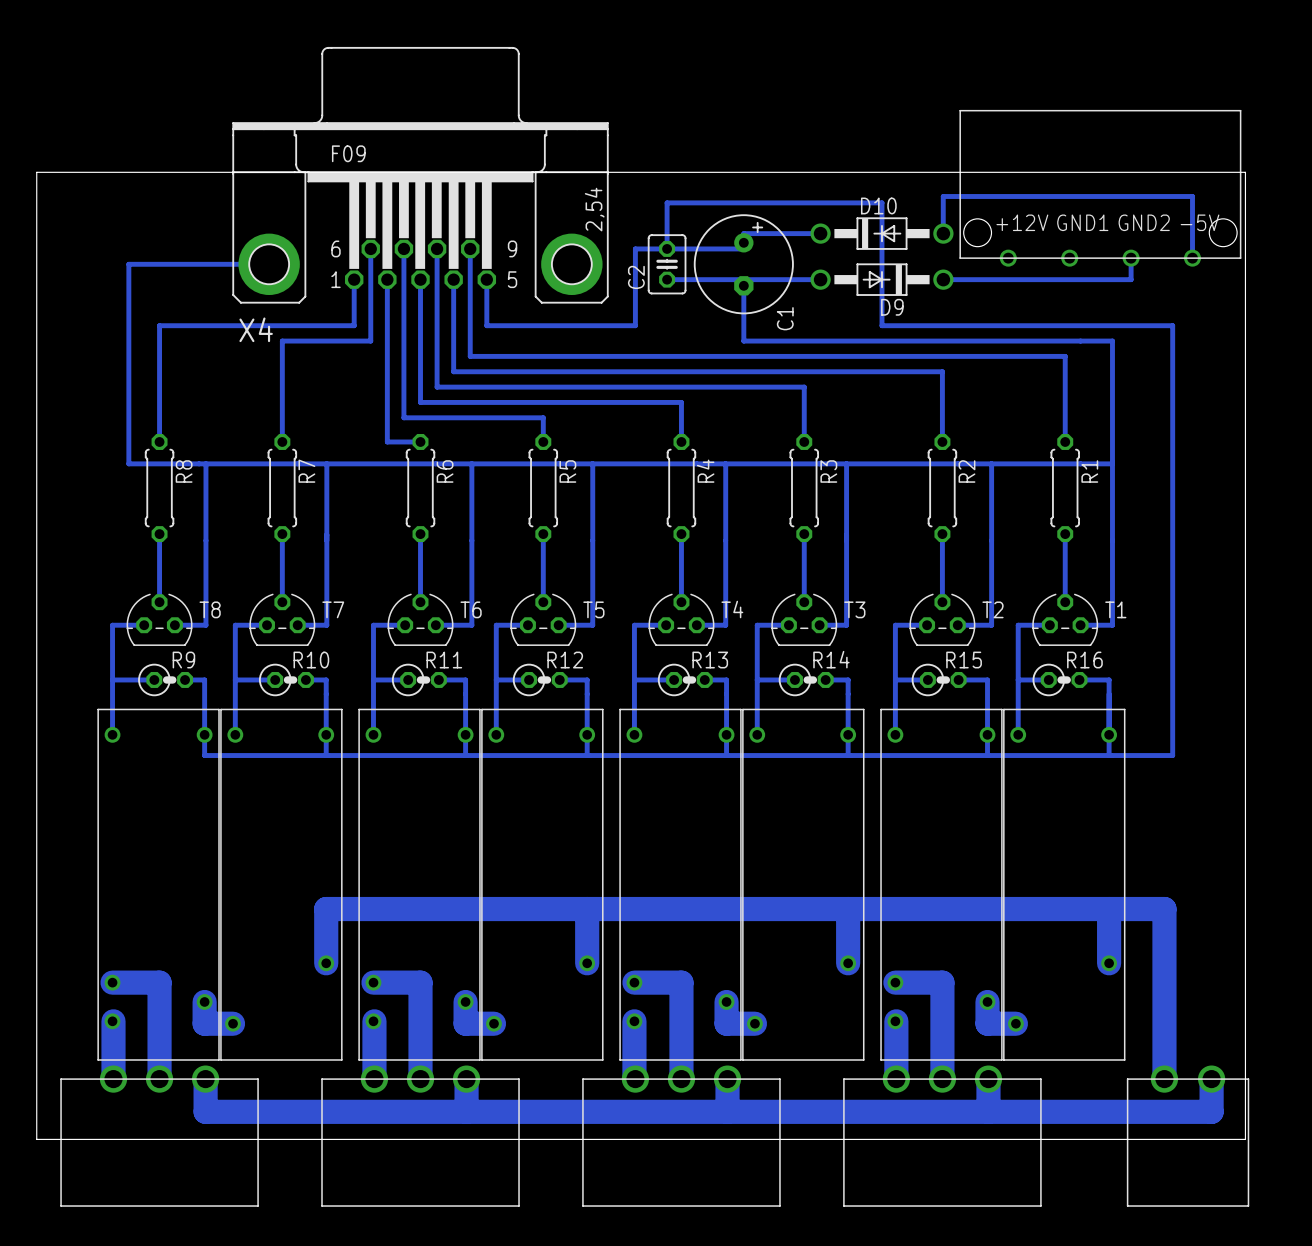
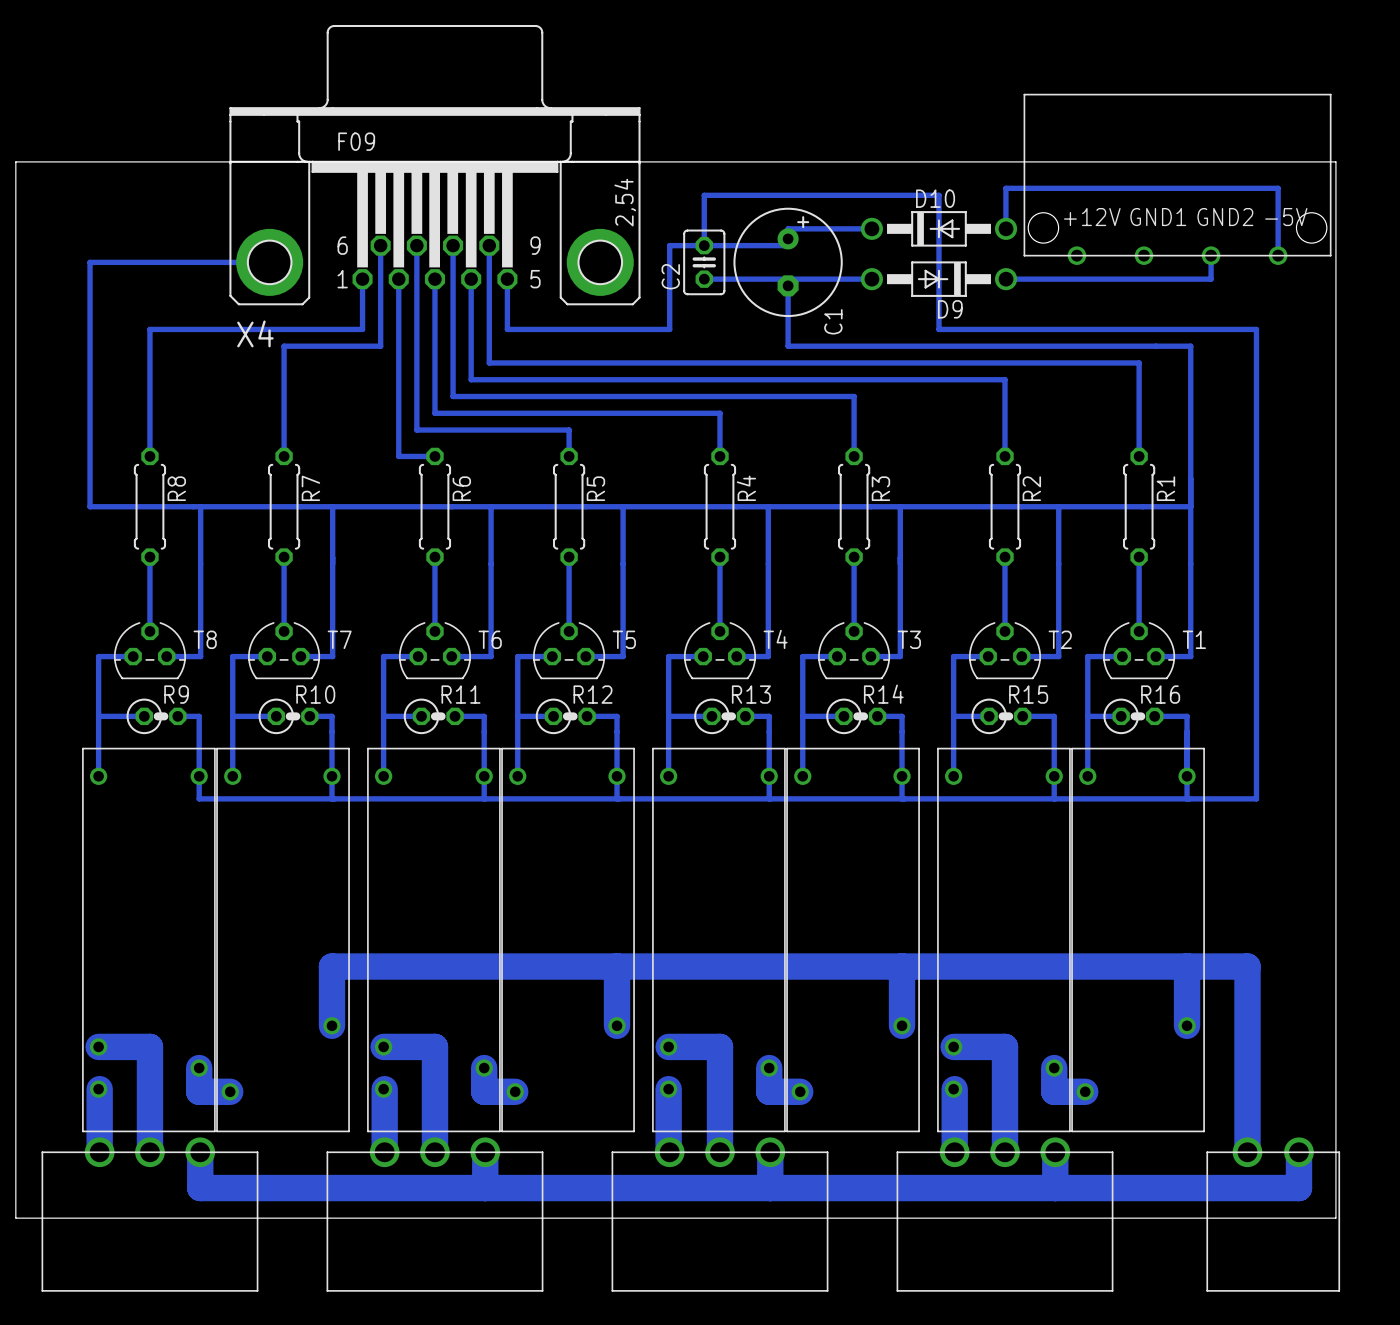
bottom track: (128, 264) (128, 463) (1112, 463) -> (116, 262) (90, 262) (90, 506) (1190, 506)
bottom track: (205, 463) (205, 488) -> none
bottom track: (326, 463) (326, 488) -> none
bottom track: (471, 463) (471, 488) -> none
bottom track: (592, 463) (592, 488) -> none
bottom track: (725, 463) (725, 488) -> none
bottom track: (846, 463) (846, 488) -> none
bottom track: (991, 463) (991, 488) -> none

